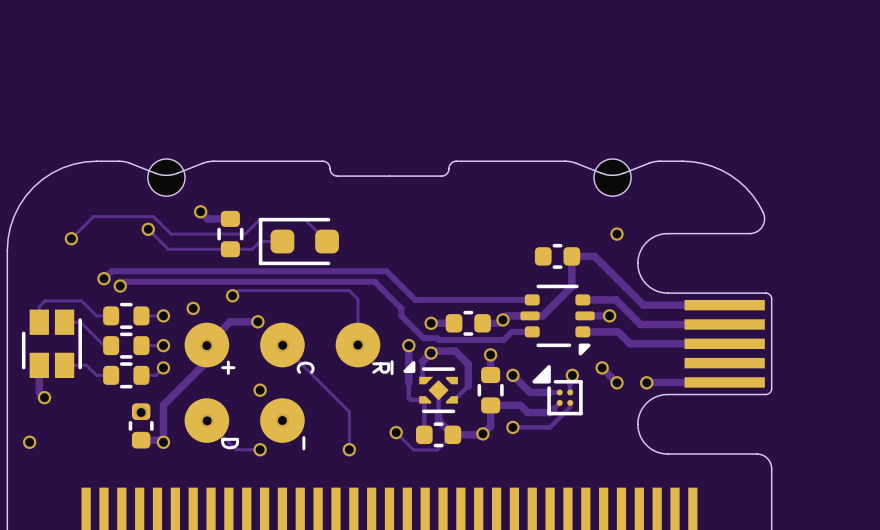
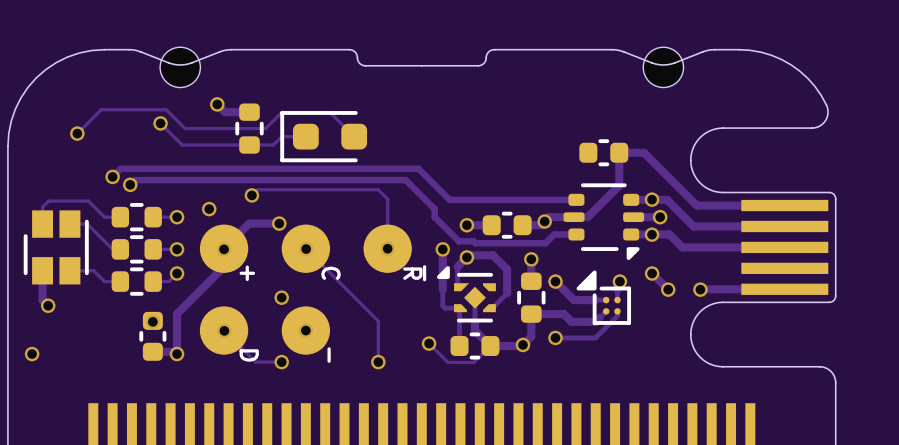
via: (617, 234) -> none
via: none -> (652, 199)
via: none -> (652, 234)

